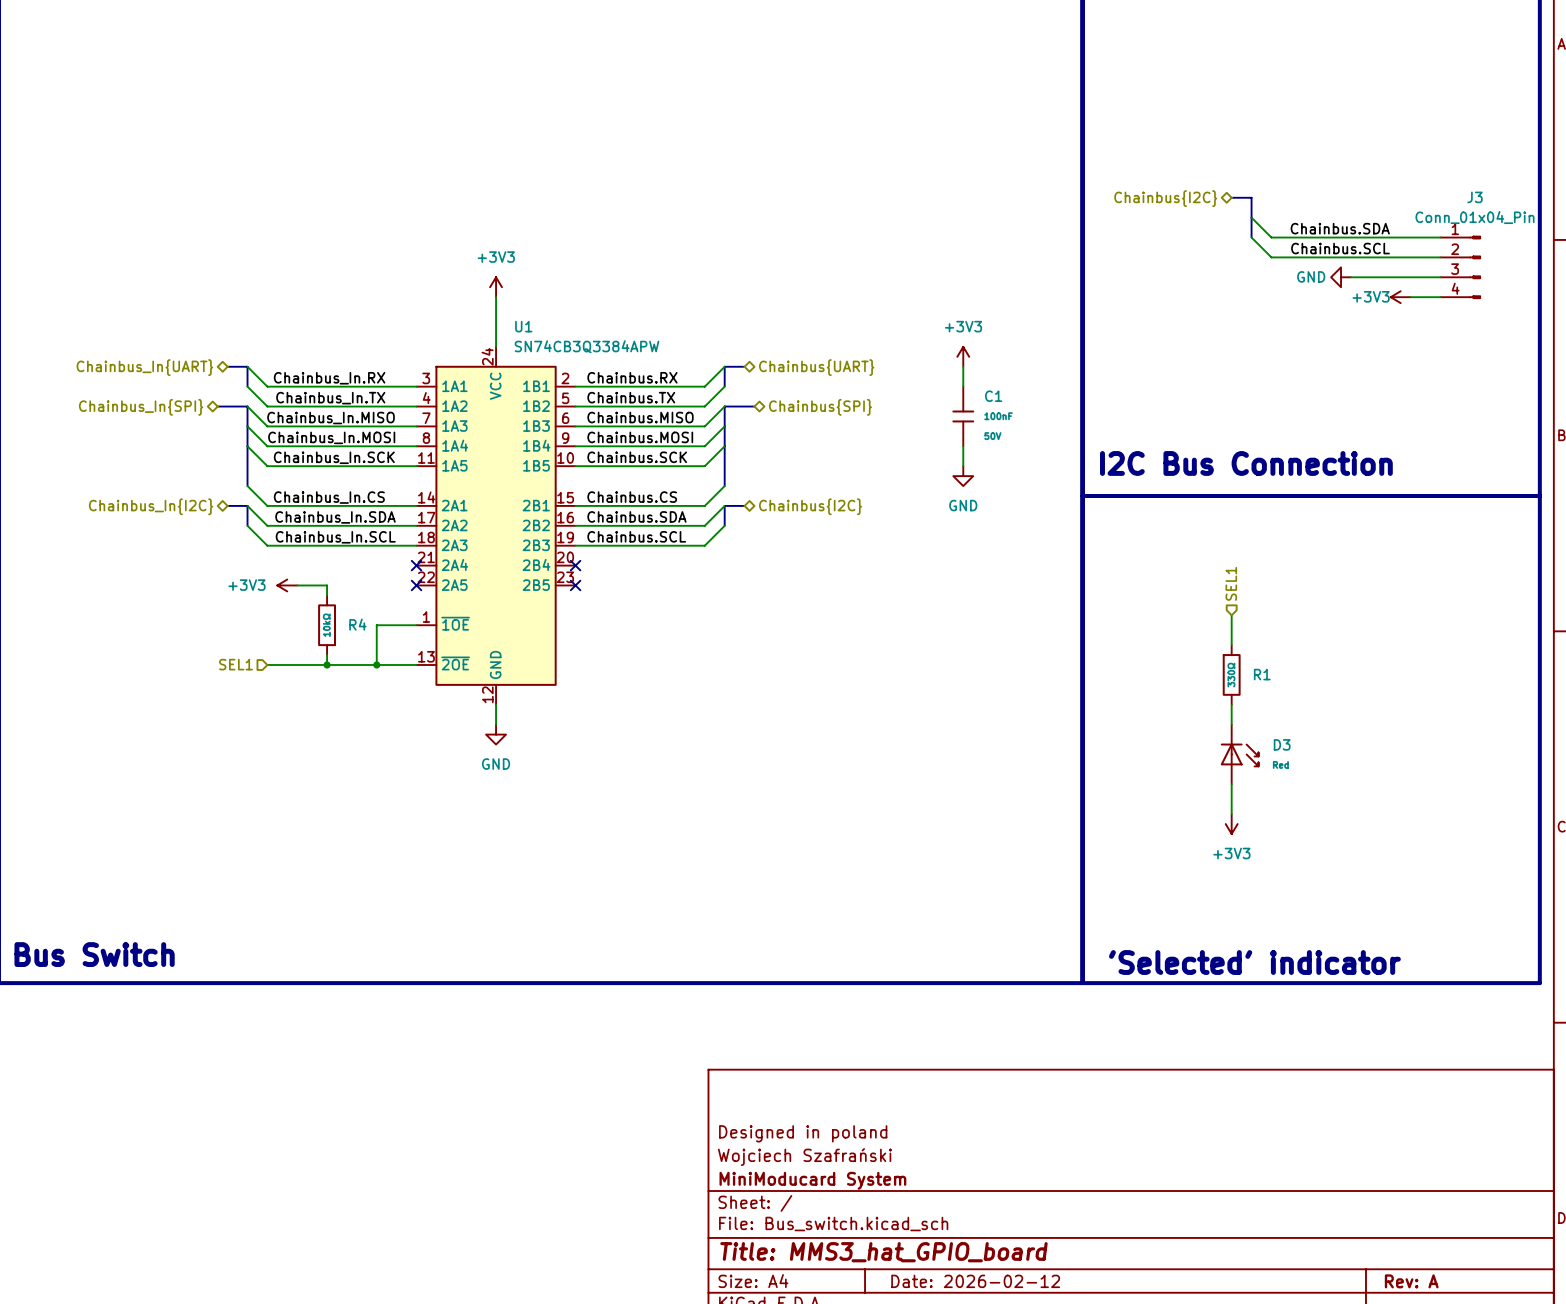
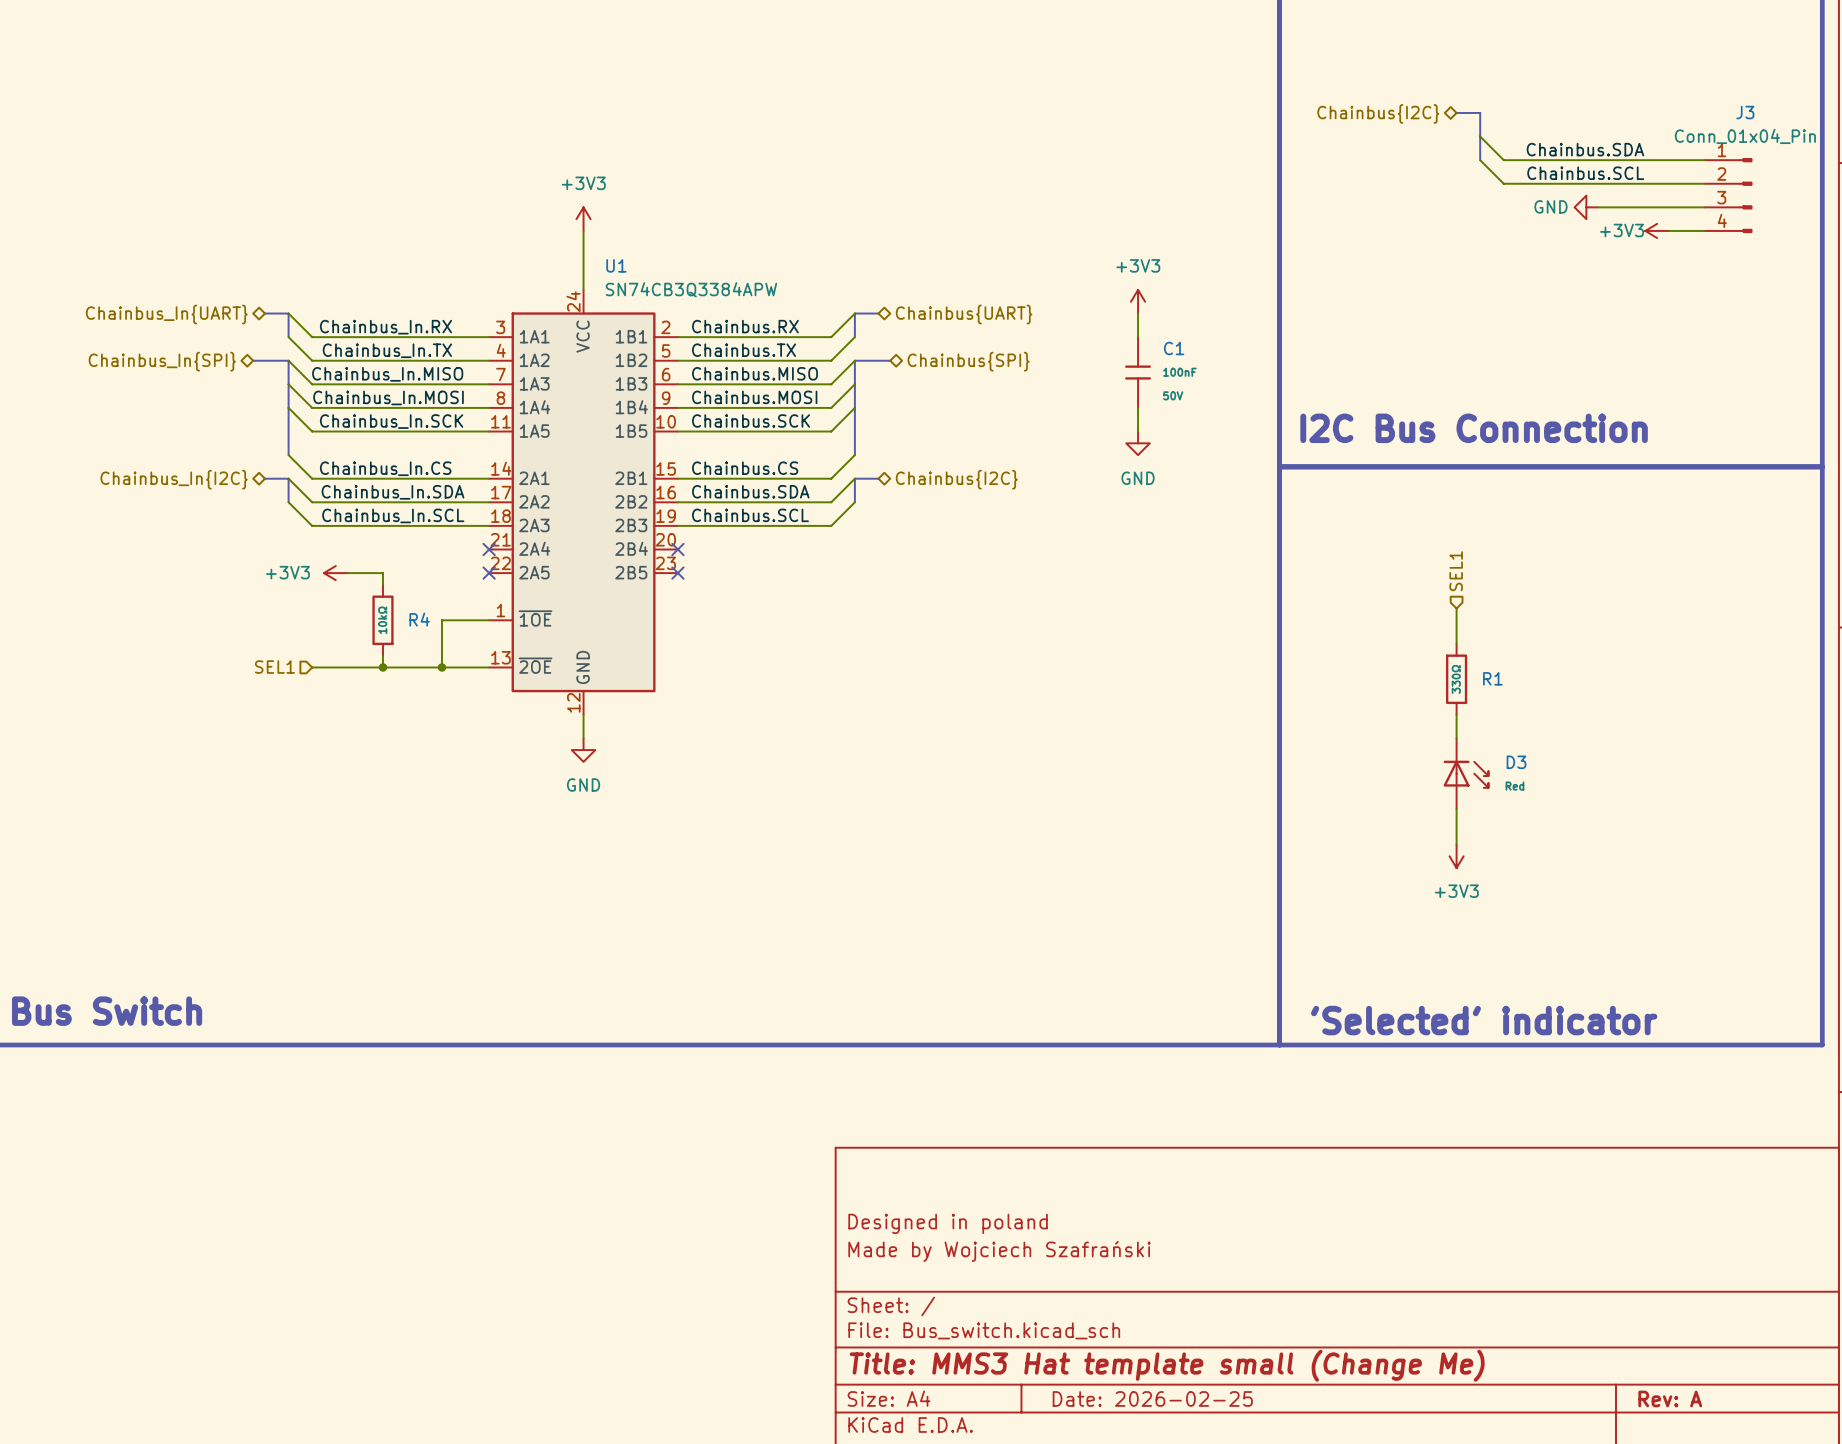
title block: Wojciech Szafrański (804, 1157) -> Made by Wojciech Szafrański (999, 1251)
title block: MiniModucard System (812, 1180) -> none
title block: Title: MMS3_hat_GPIO_board (883, 1252) -> Title: MMS3 Hat template small (Change Me) (1167, 1365)
title block: Date: 2026-02-12 (975, 1281) -> Date: 2026-02-25 (1152, 1398)

